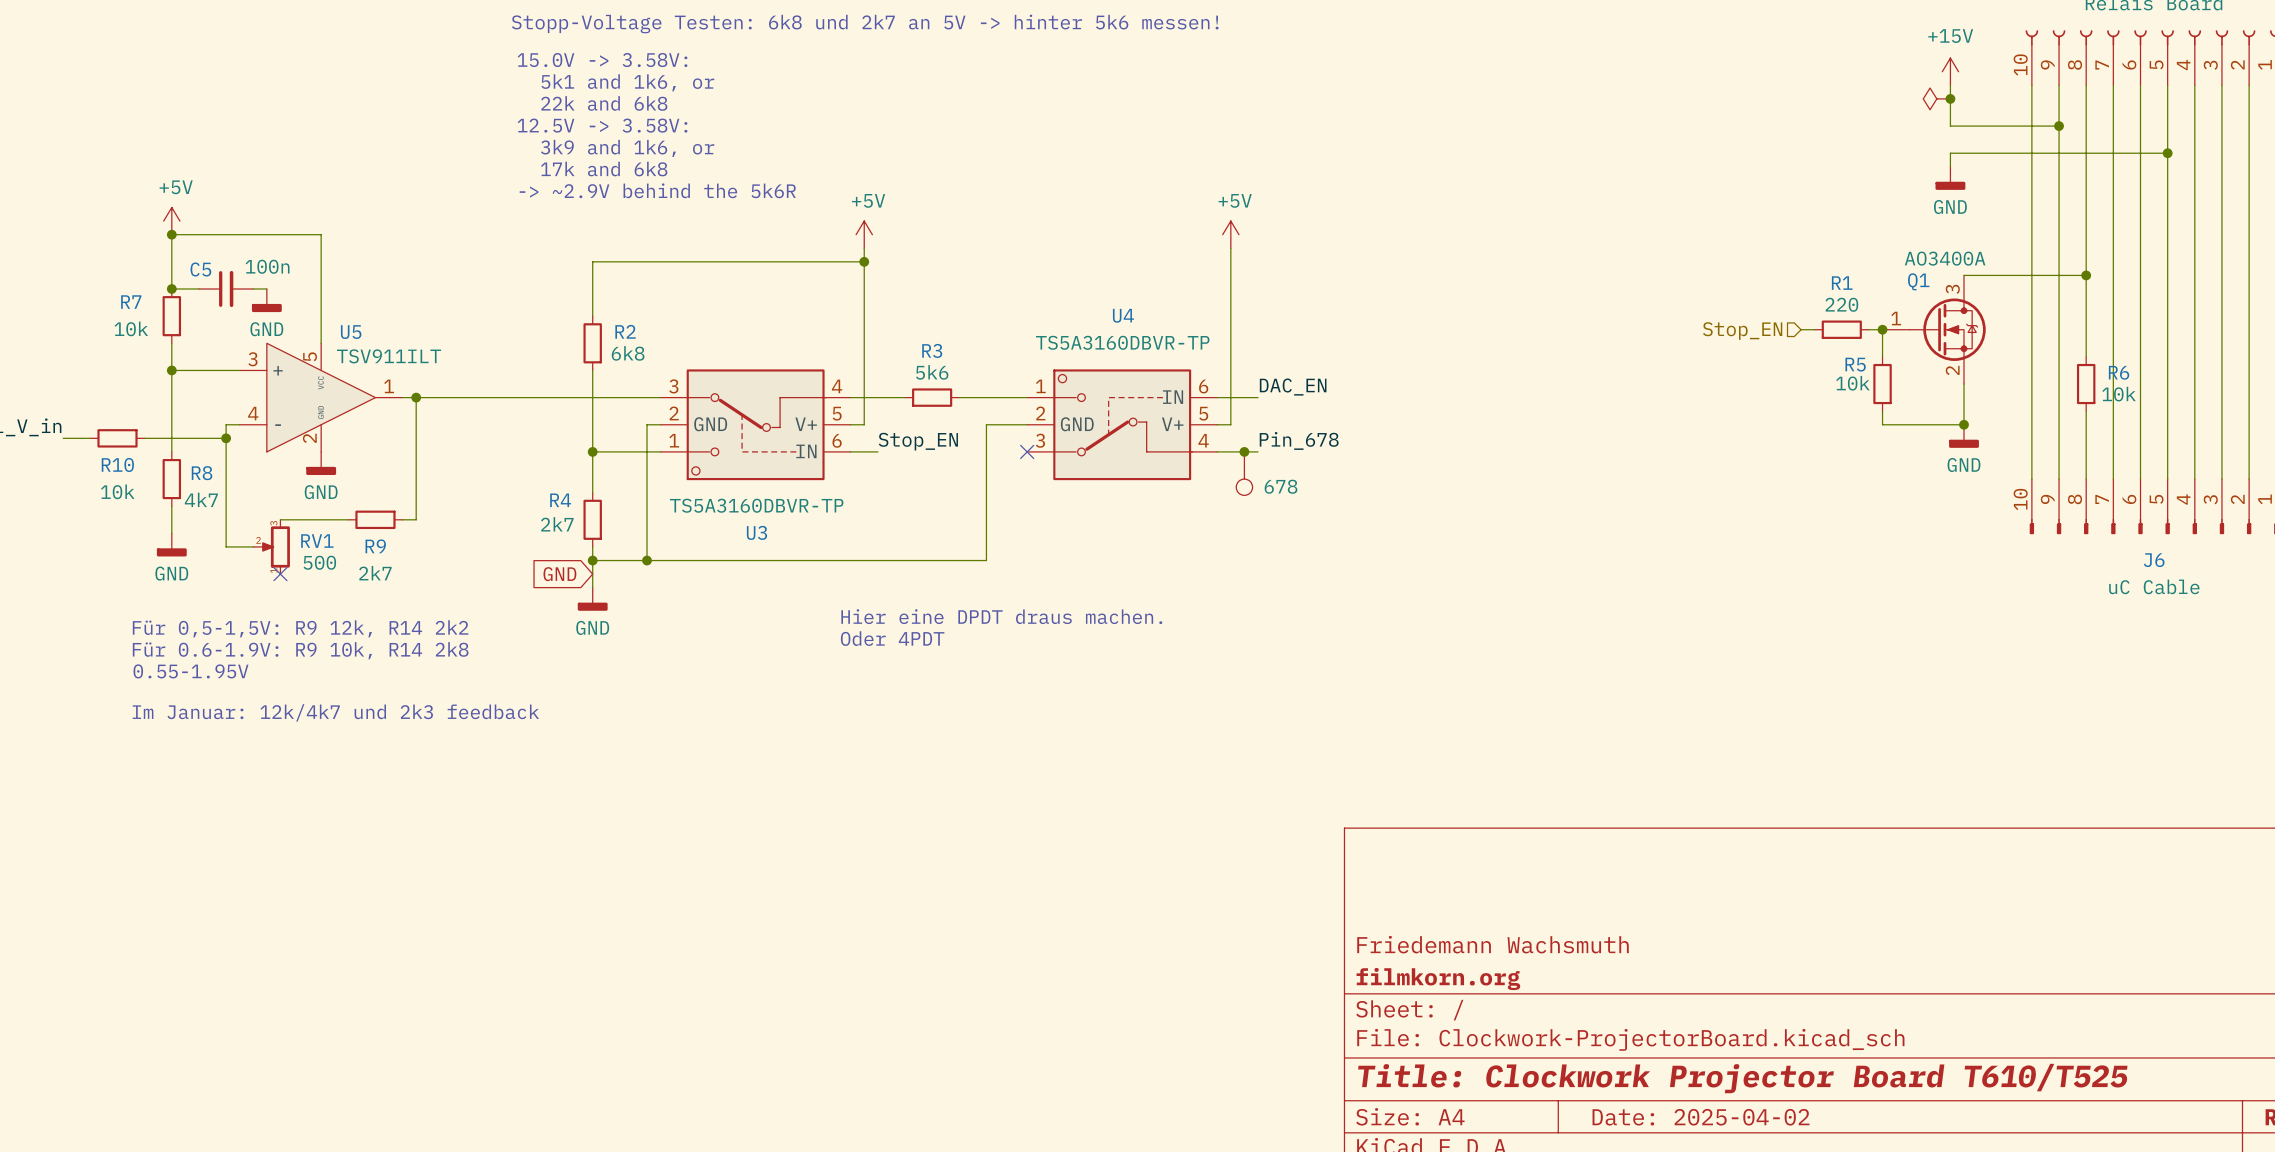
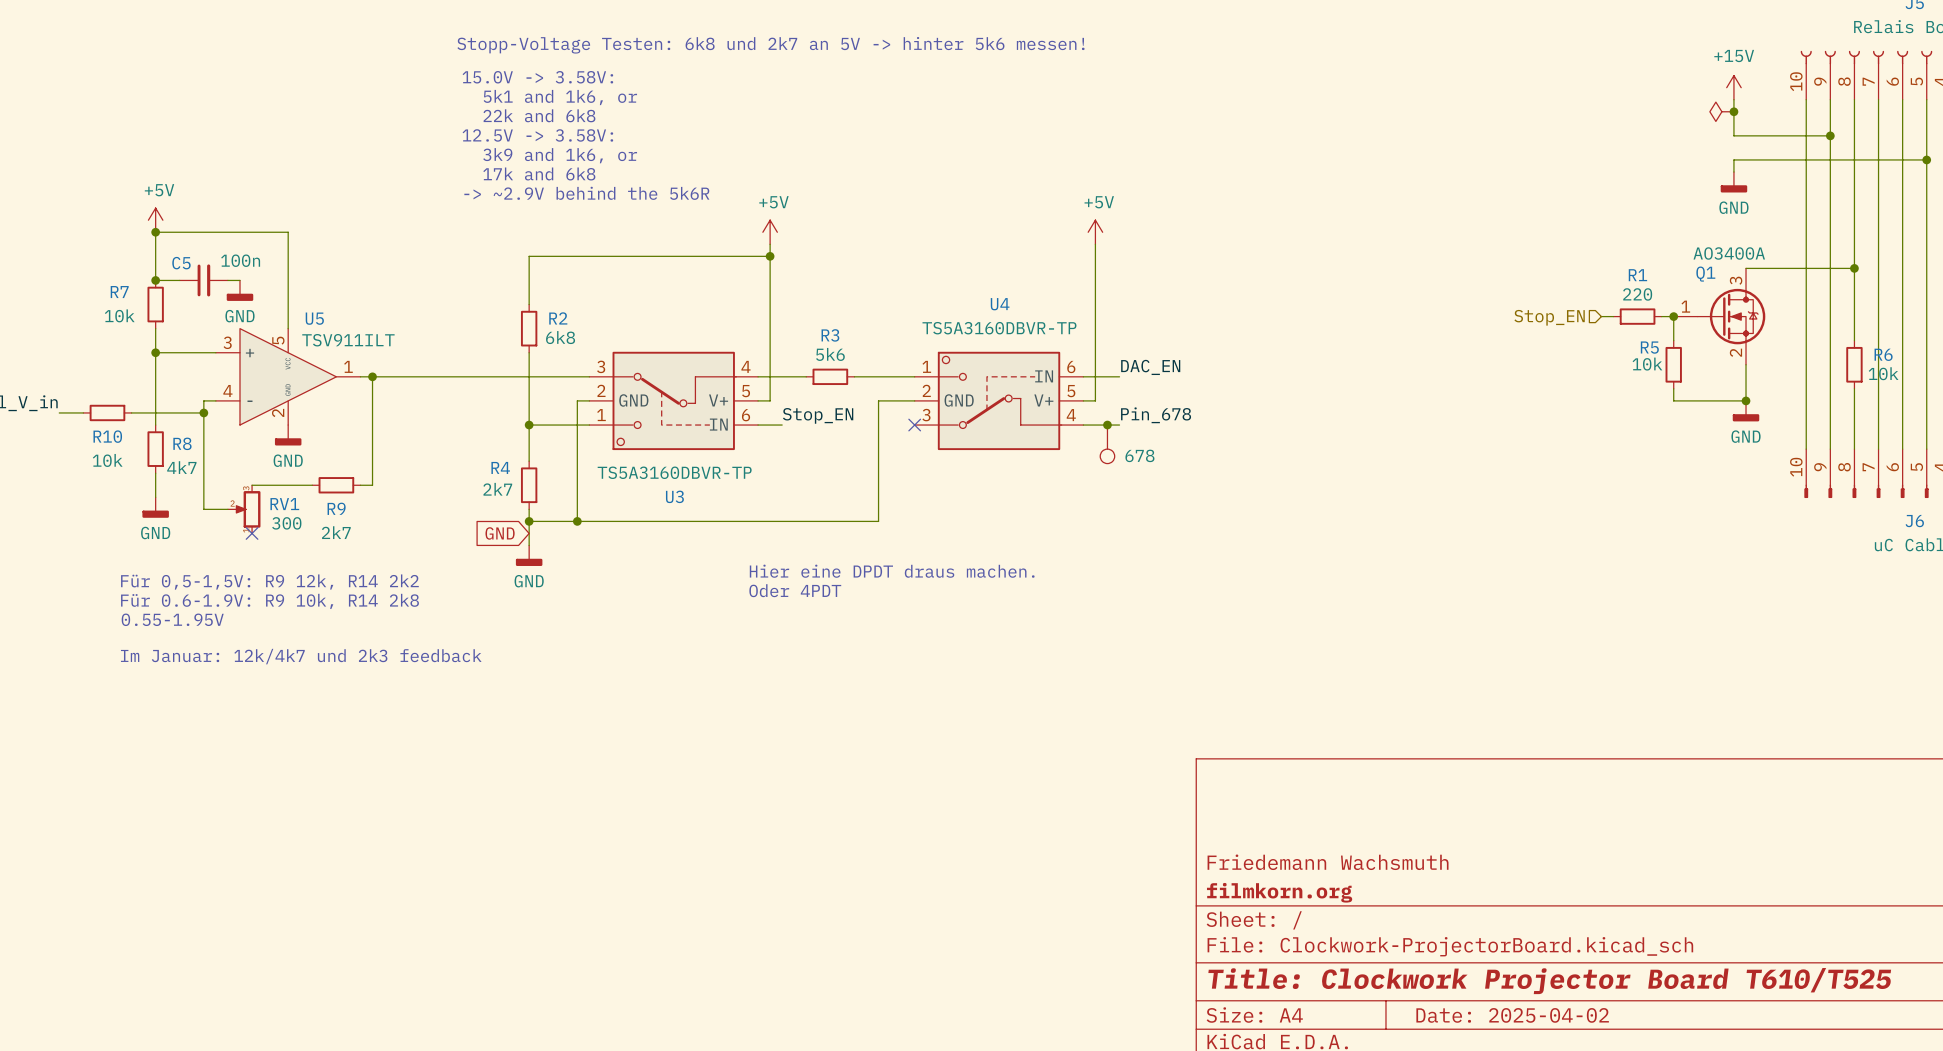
RV1 value: 500 (319, 562) -> 300 (286, 523)

